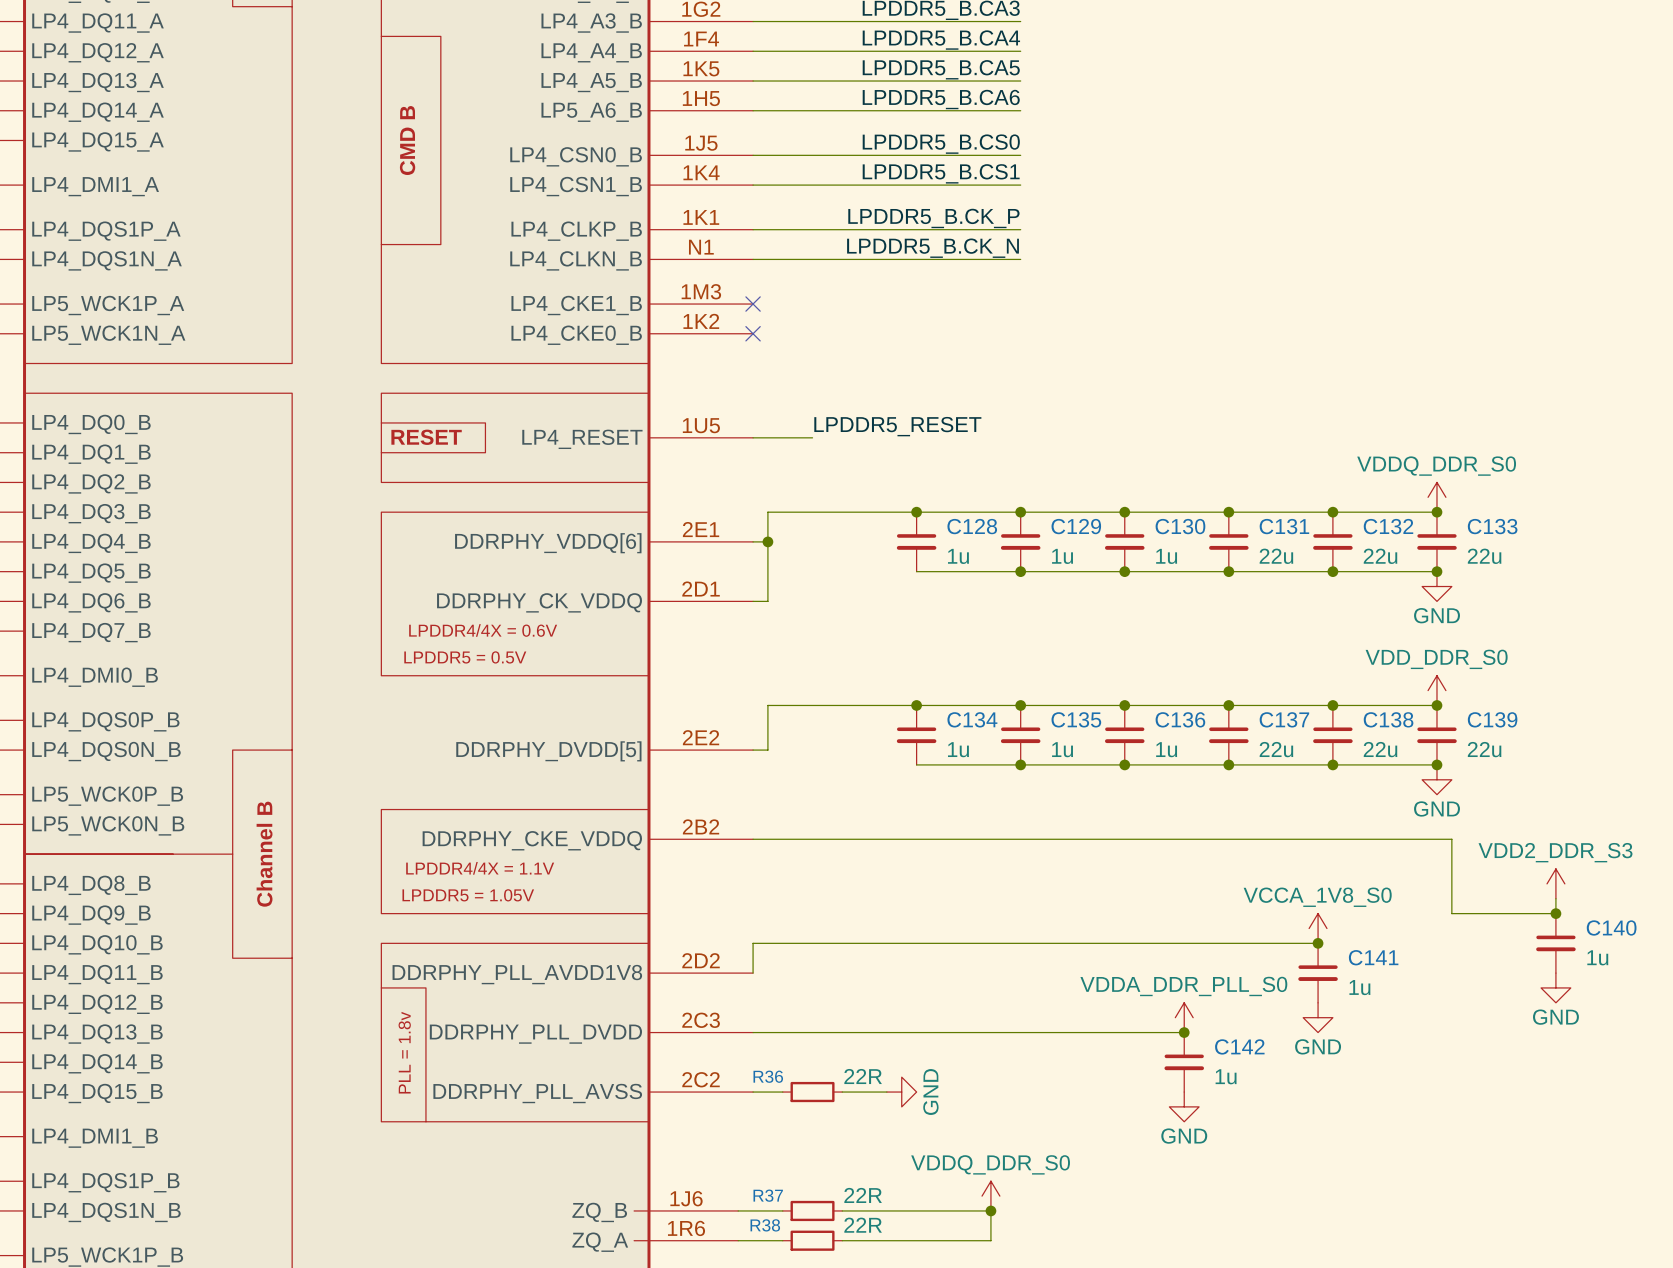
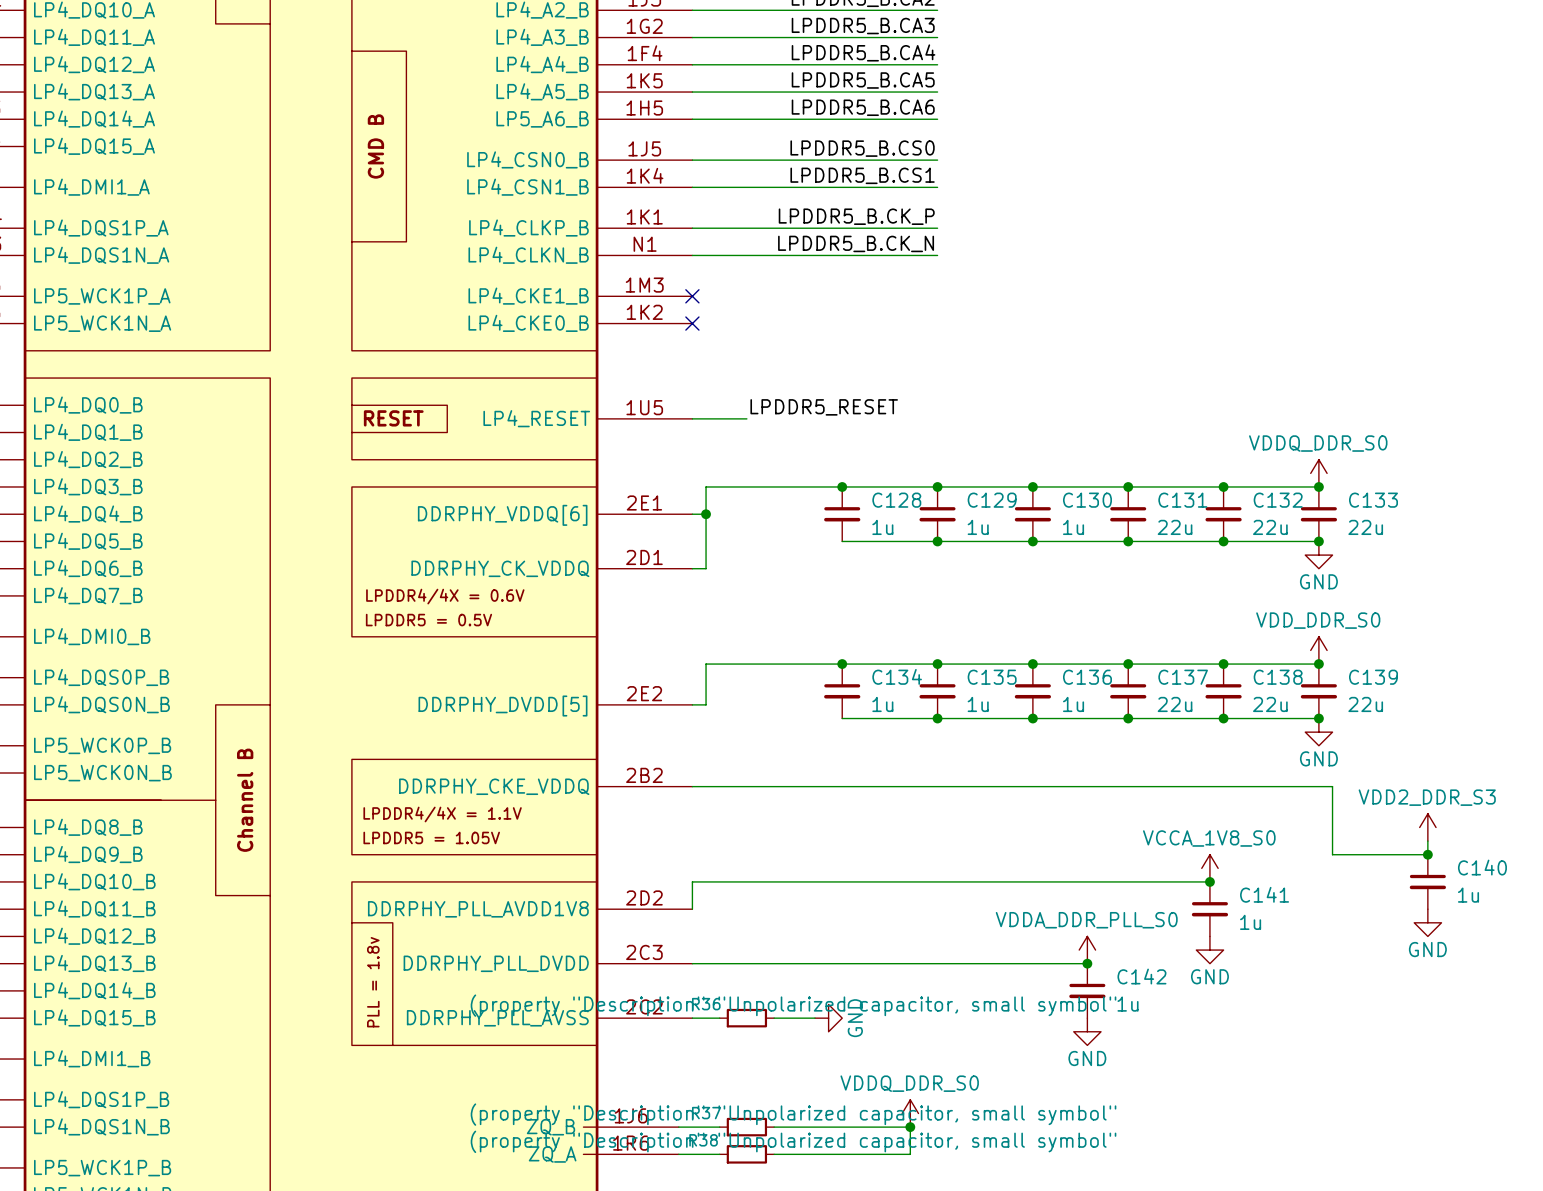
R36 value: 22R (863, 1076) -> (property "Description" "Unpolarized capacitor, small symbol" (793, 1005)
R37 value: 22R (863, 1195) -> (property "Description" "Unpolarized capacitor, small symbol" (793, 1114)
R38 value: 22R (863, 1225) -> (property "Description" "Unpolarized capacitor, small symbol" (793, 1141)

